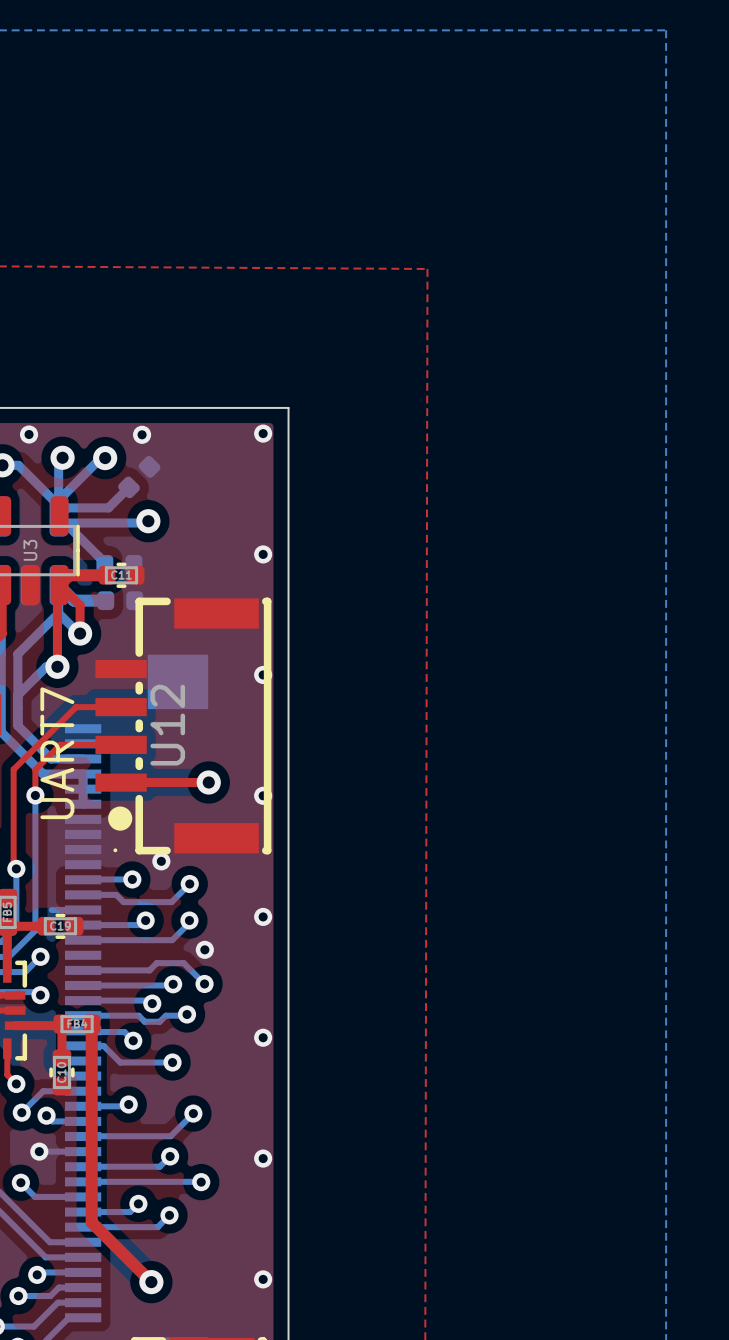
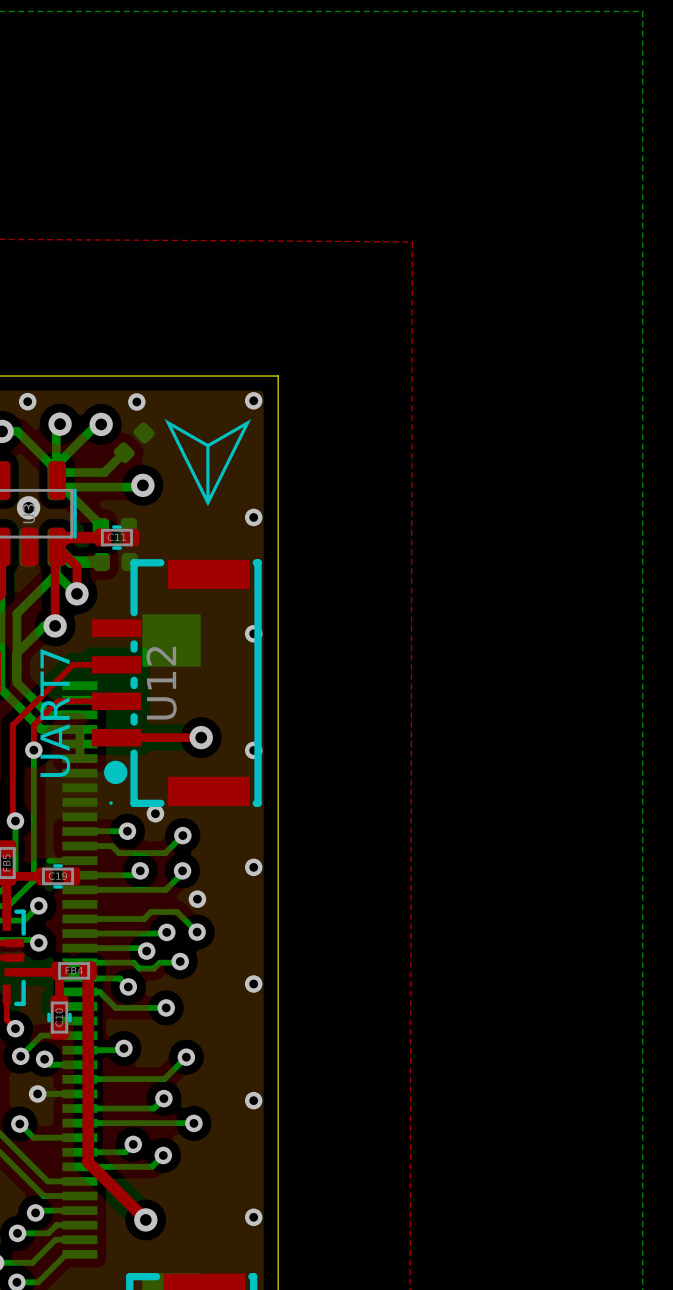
drawing: none -> [164, 419, 252, 507]
via: none -> (28, 507)

